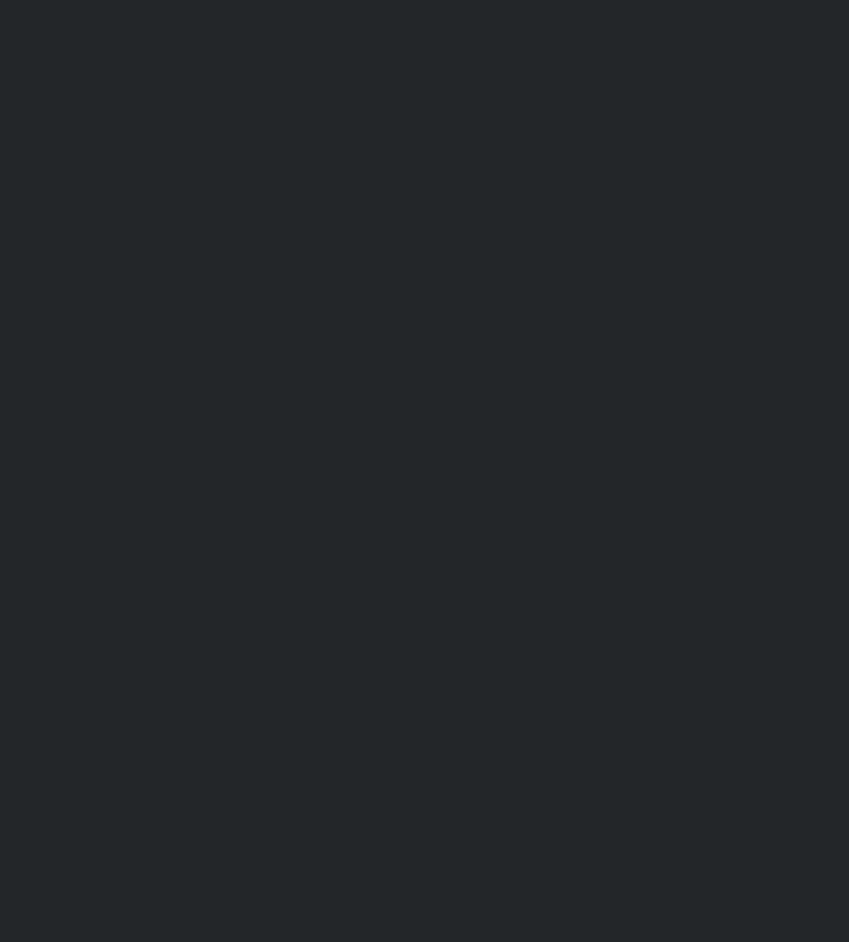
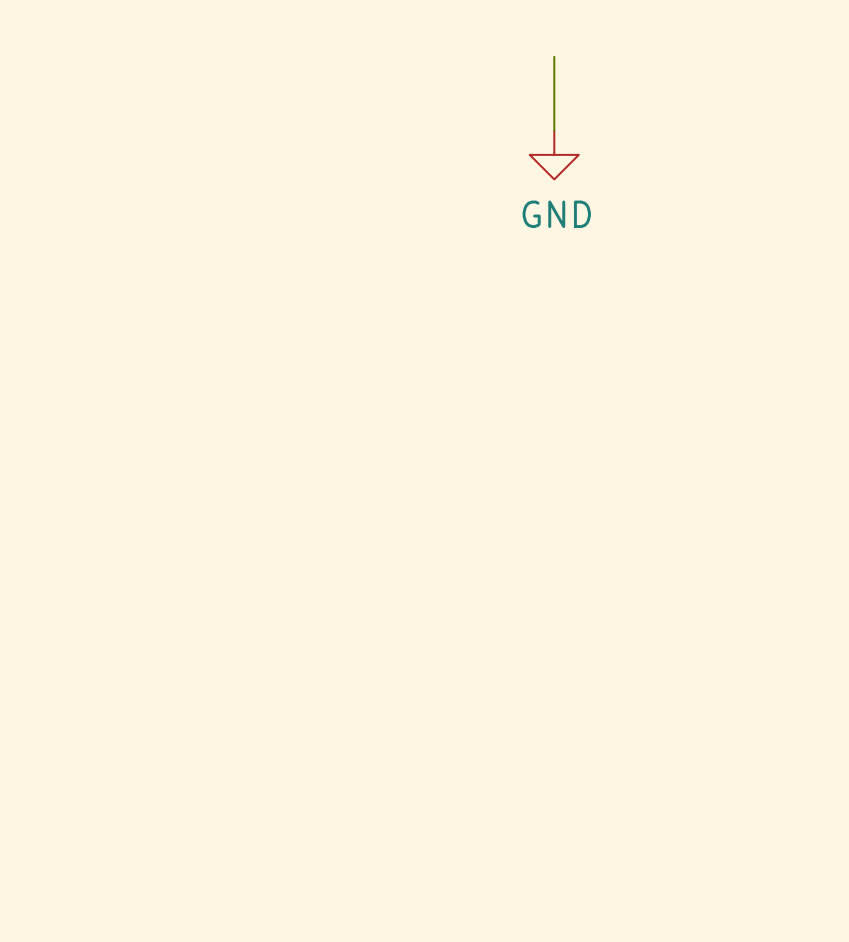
wire: none -> (554, 56) (554, 130)
power symbol: none -> GND (554, 154)

